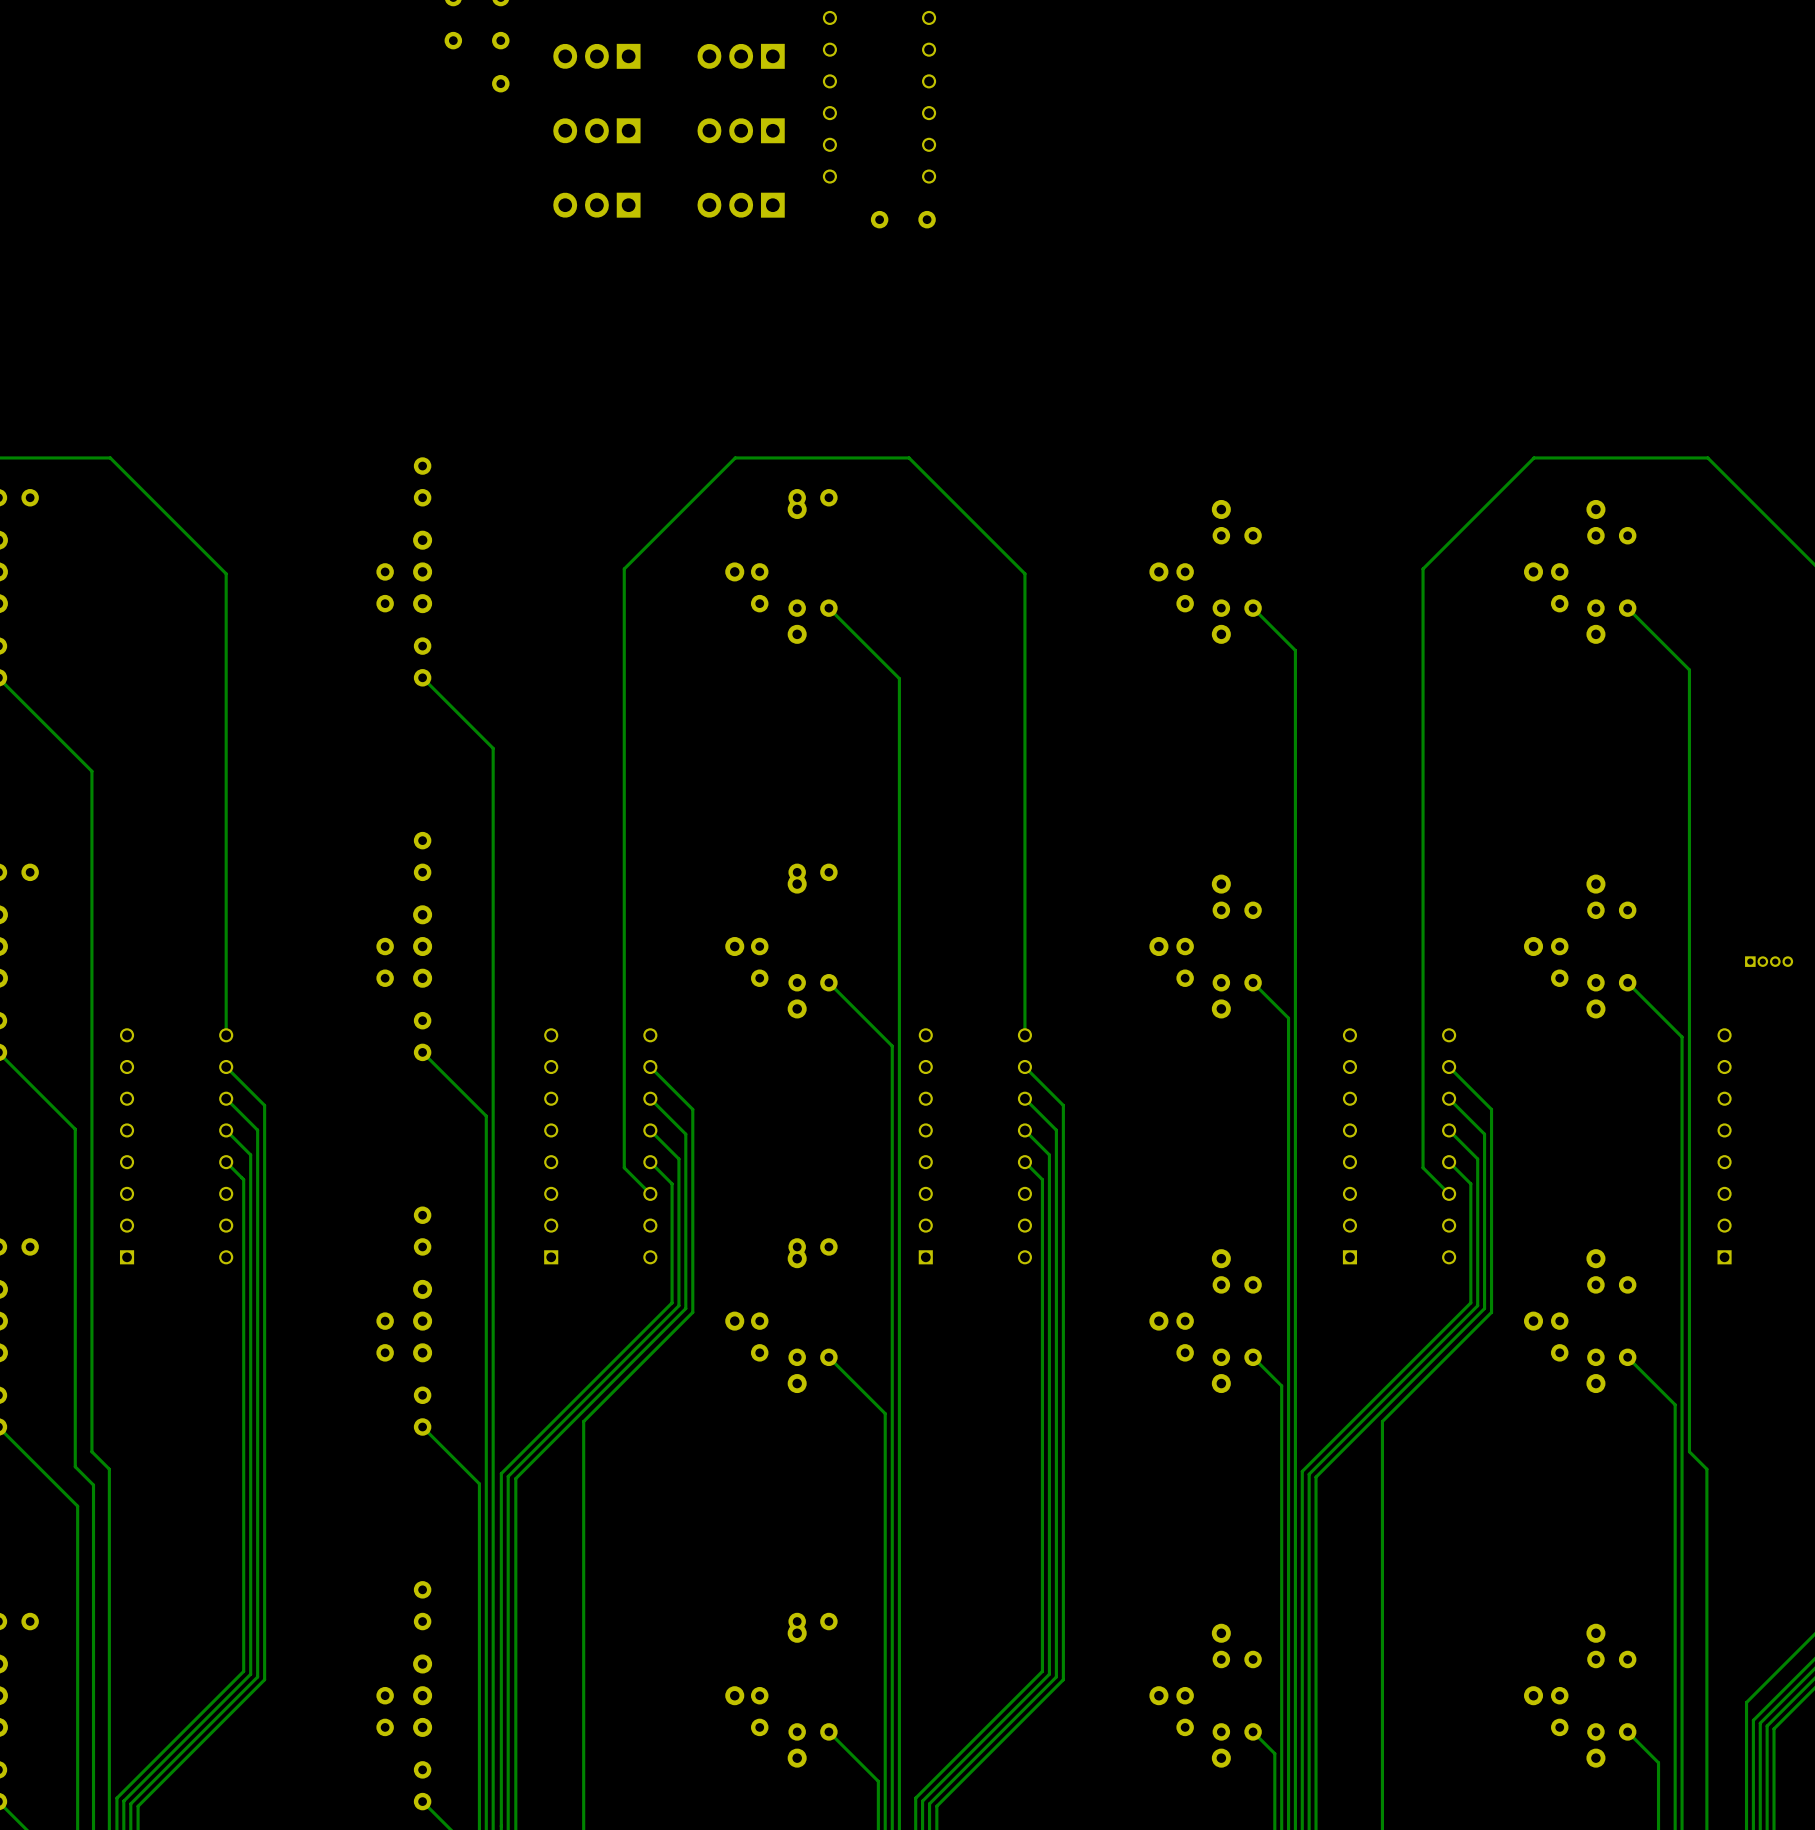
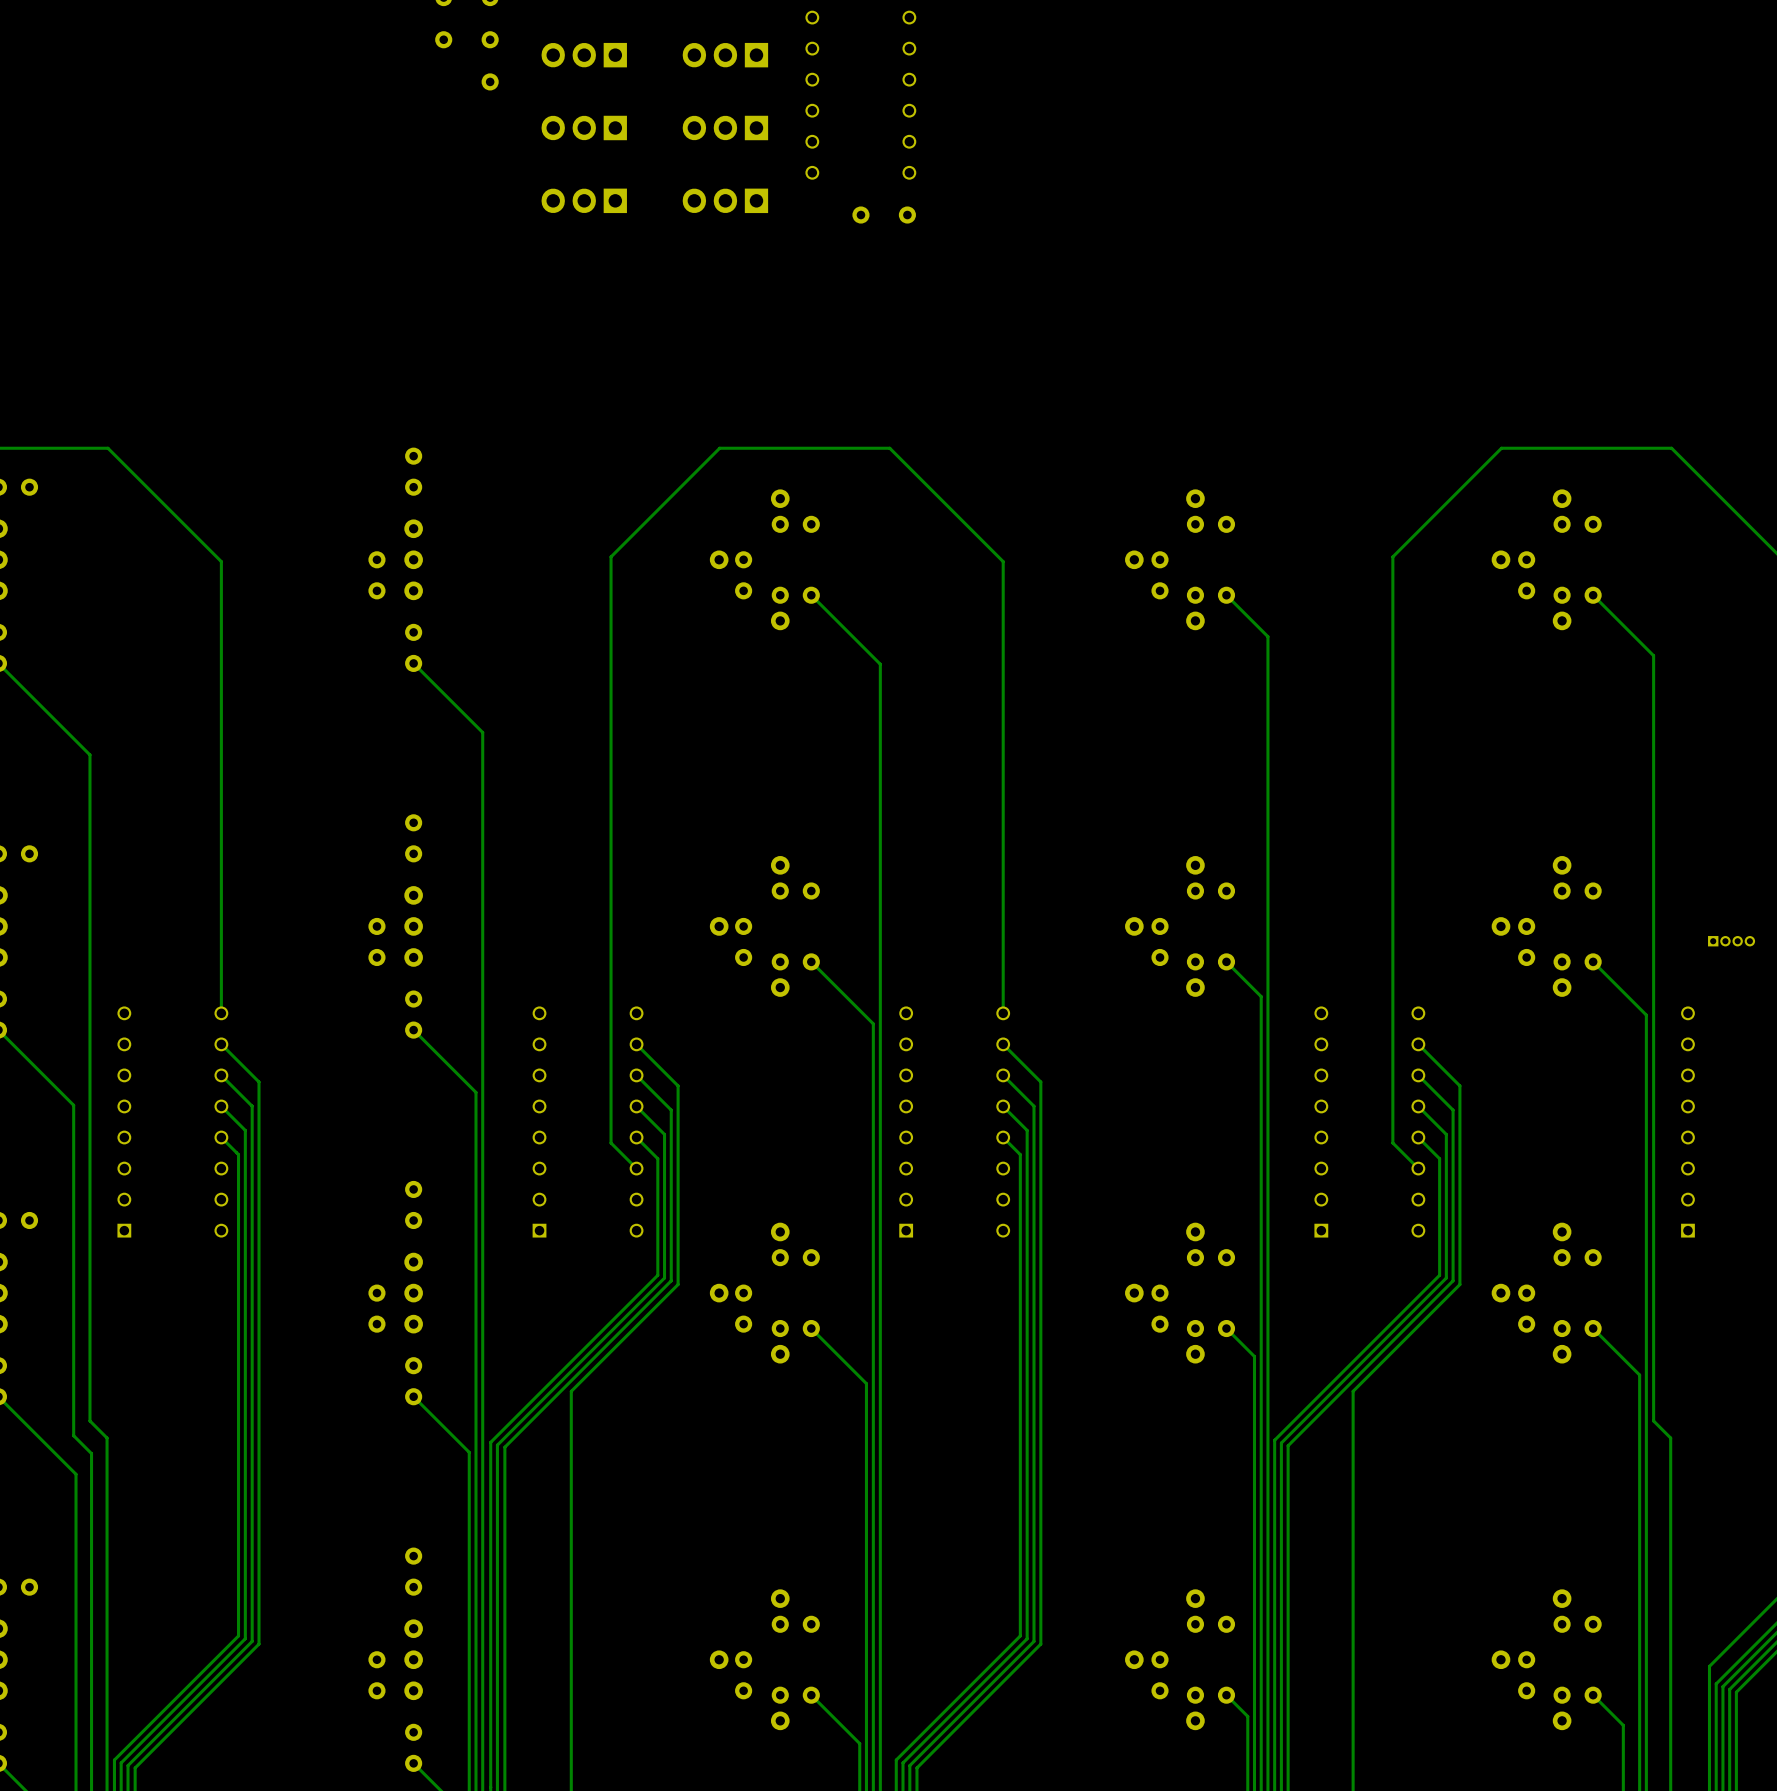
part position: (813, 497) -> (795, 524)
part position: (813, 872) -> (795, 891)
part position: (813, 1246) -> (795, 1257)
part position: (813, 1621) -> (795, 1624)

